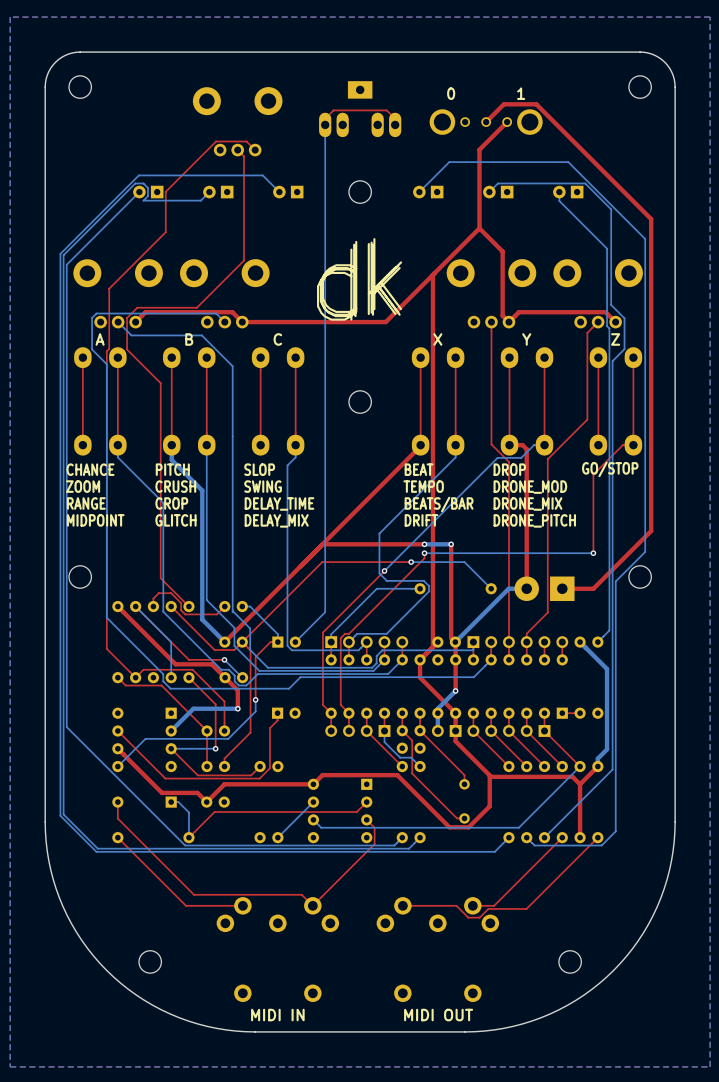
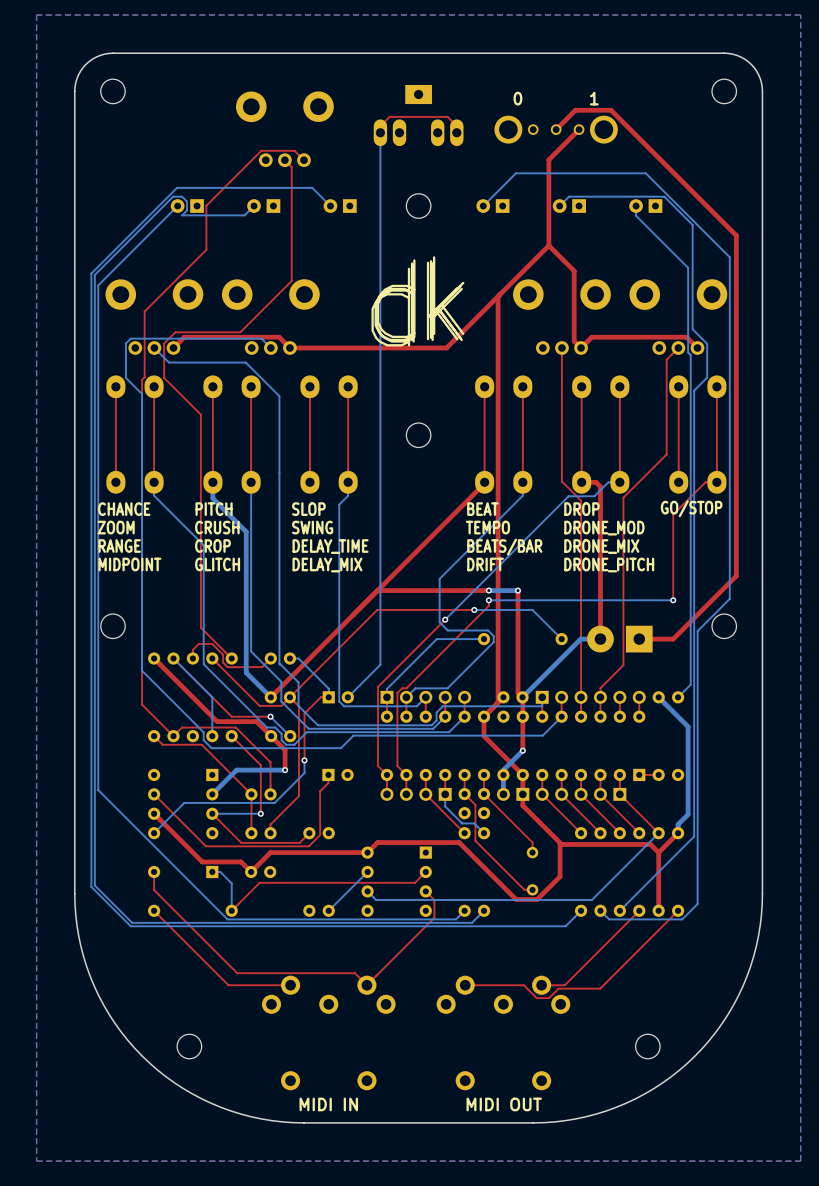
text: A (100, 339) -> none
text: B (189, 339) -> none
text: C (277, 339) -> none
text: X (437, 339) -> none
text: Y (526, 339) -> none
text: Z (615, 339) -> none

